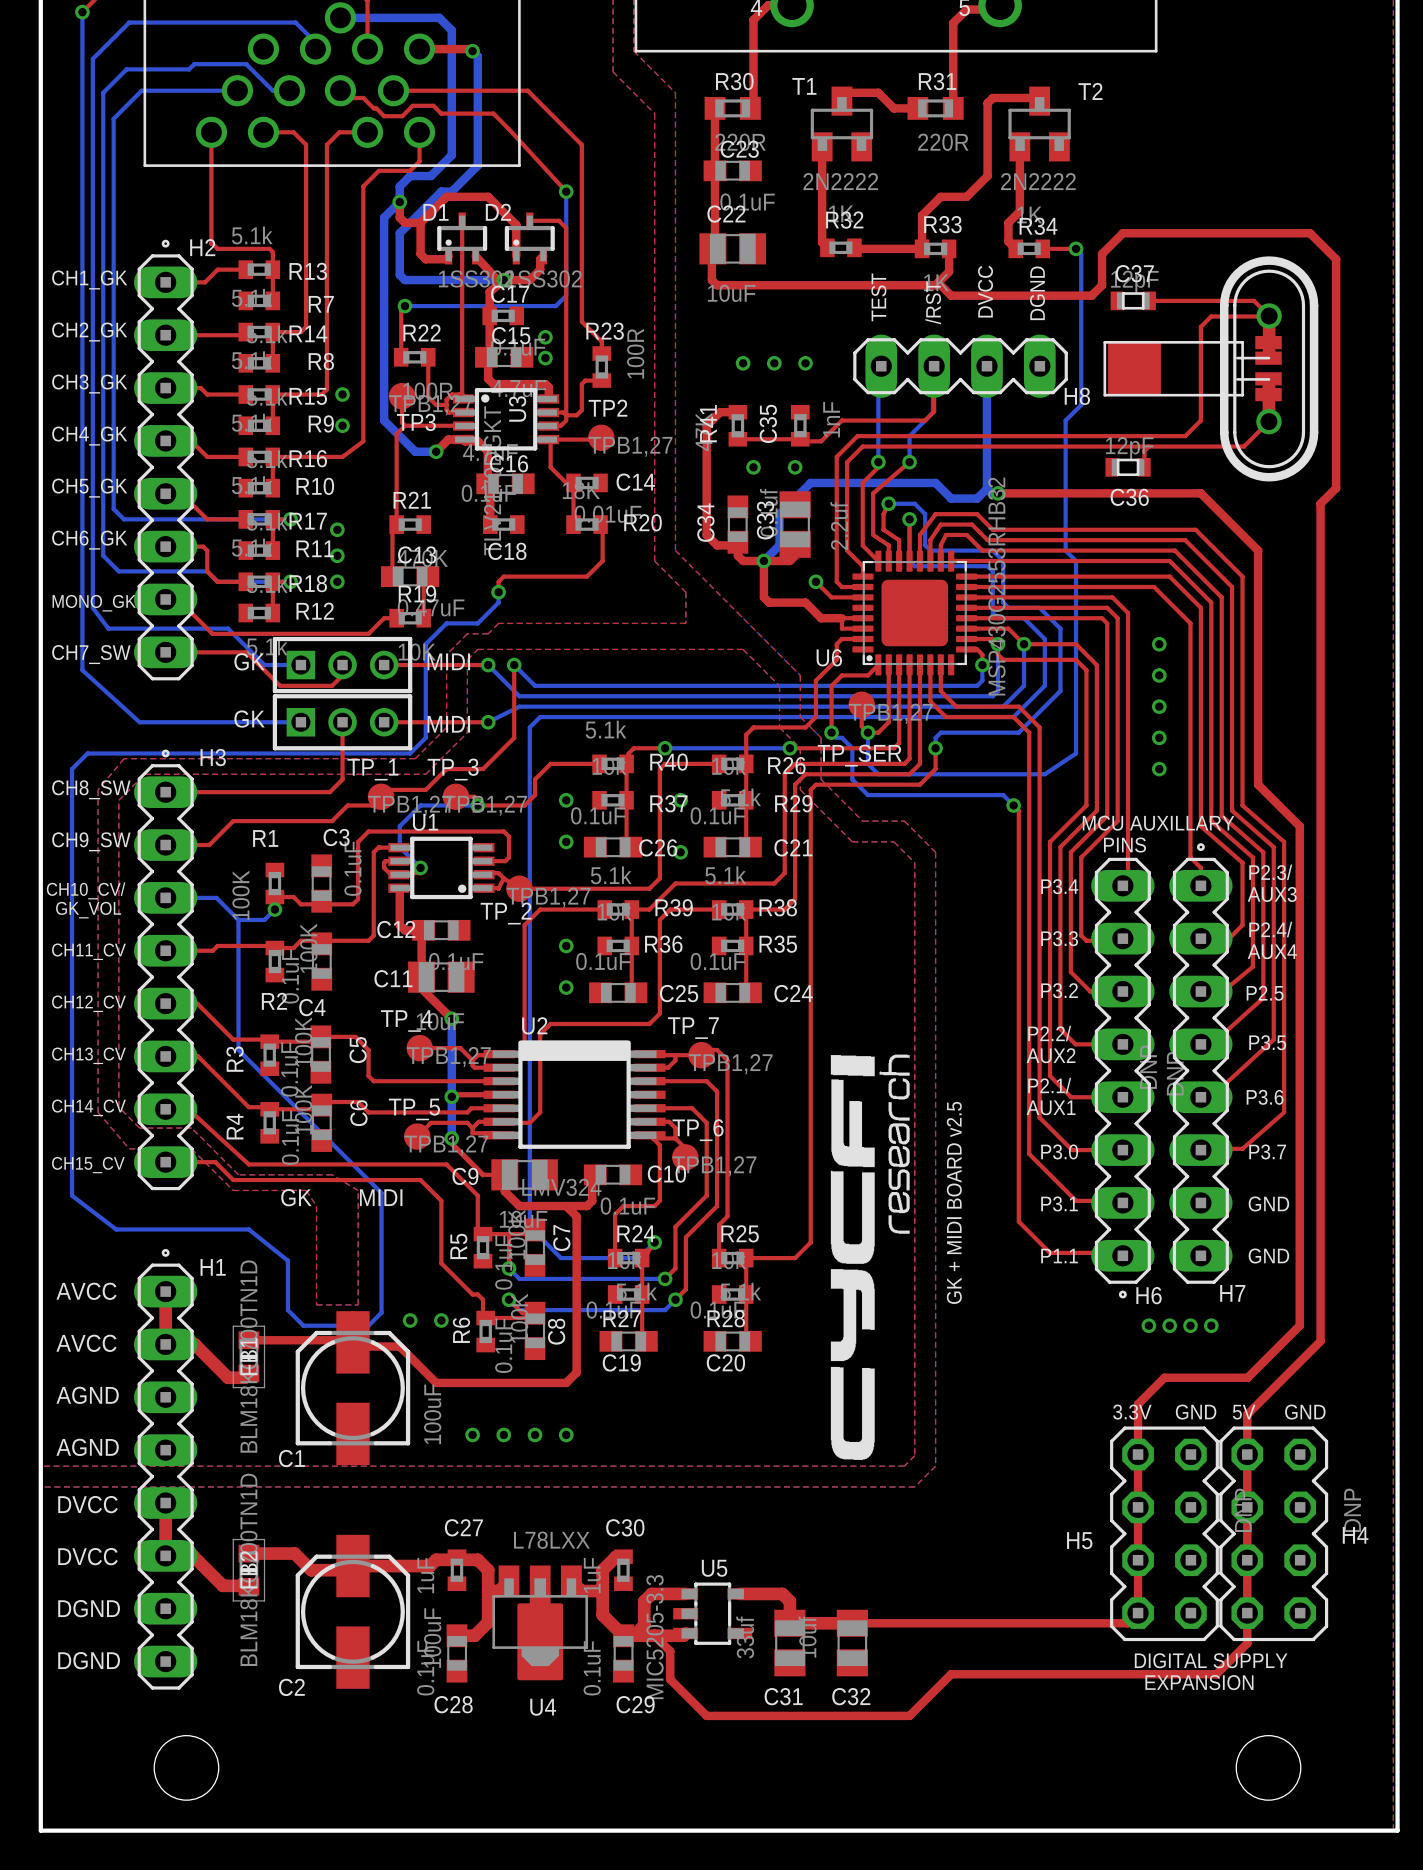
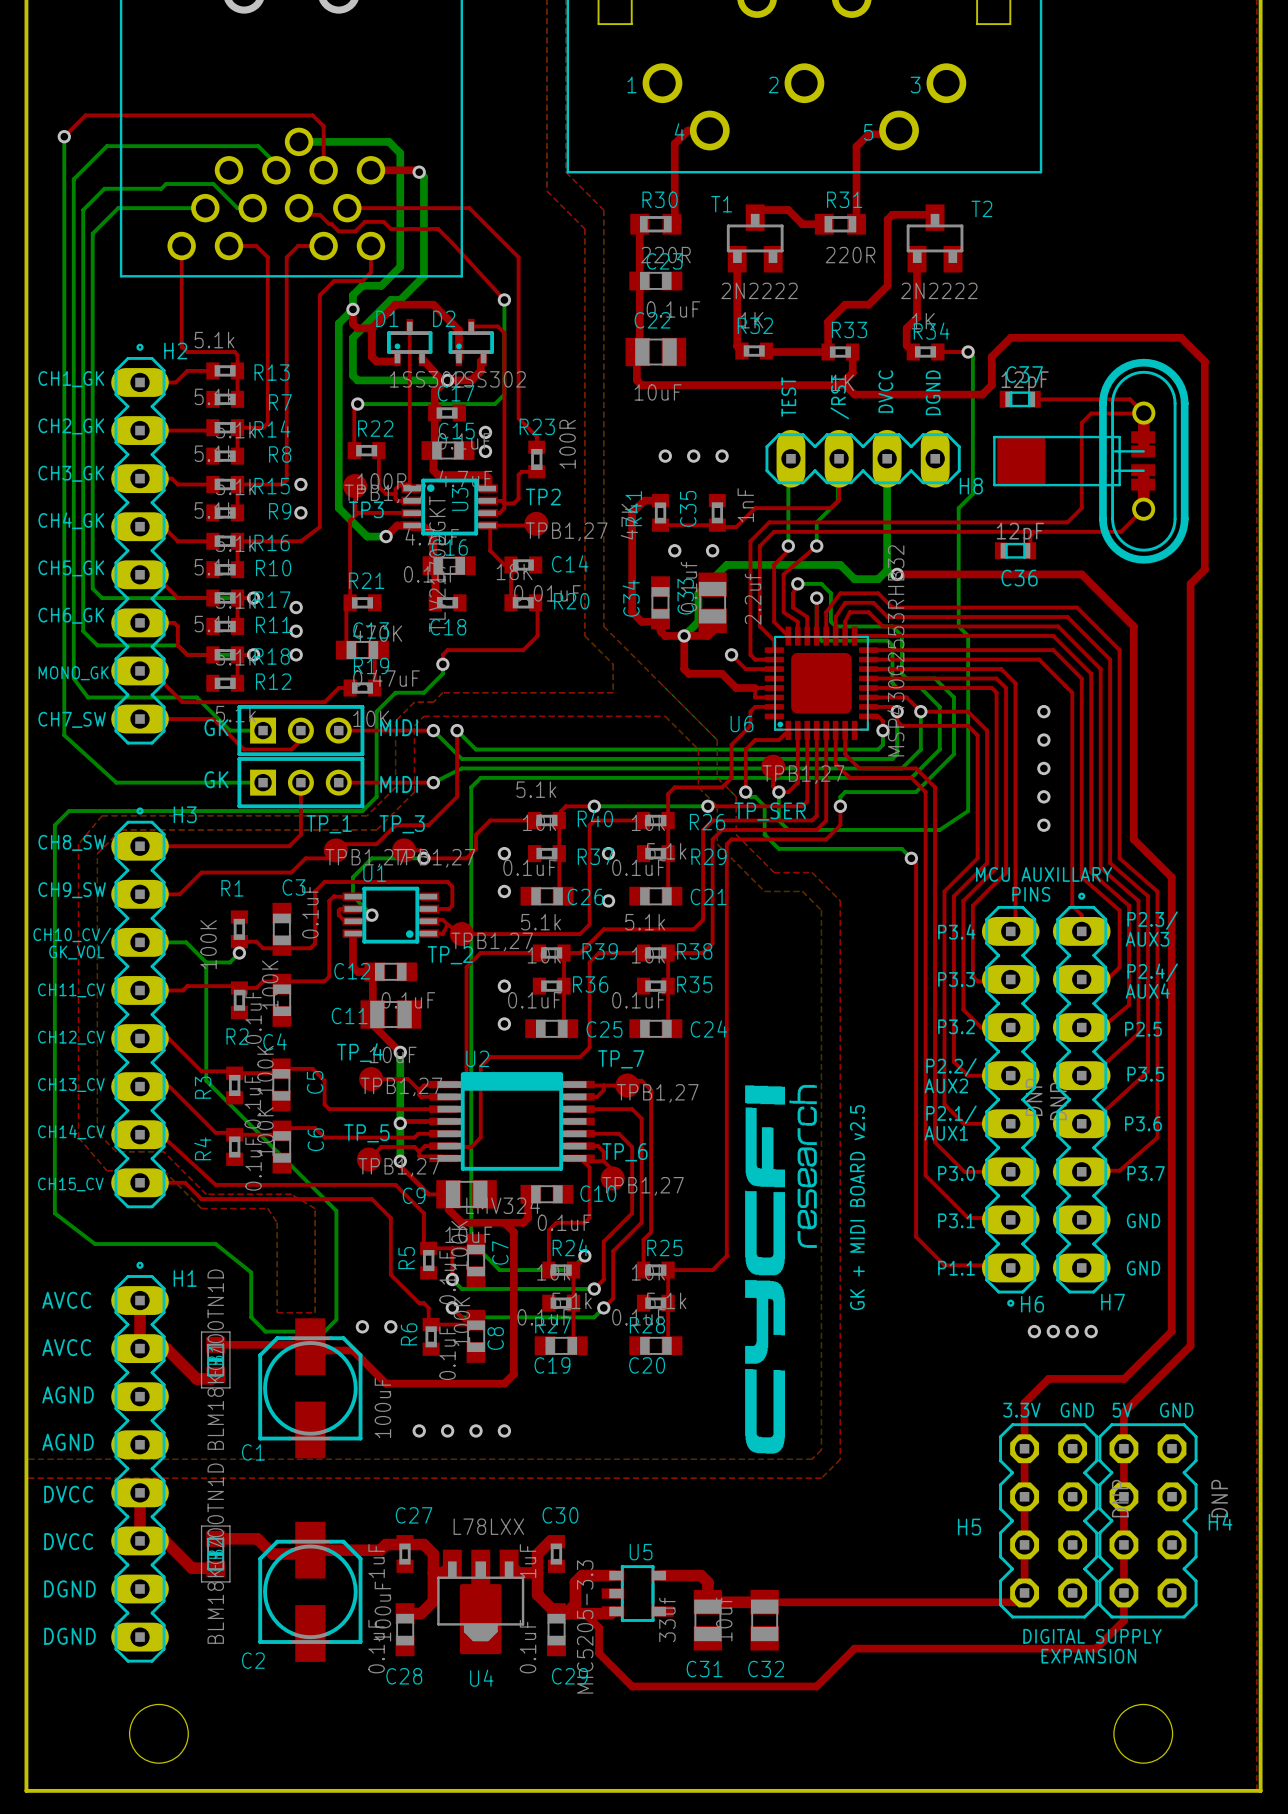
text: GK (296, 1197) -> none
text: MIDI (381, 1197) -> none

